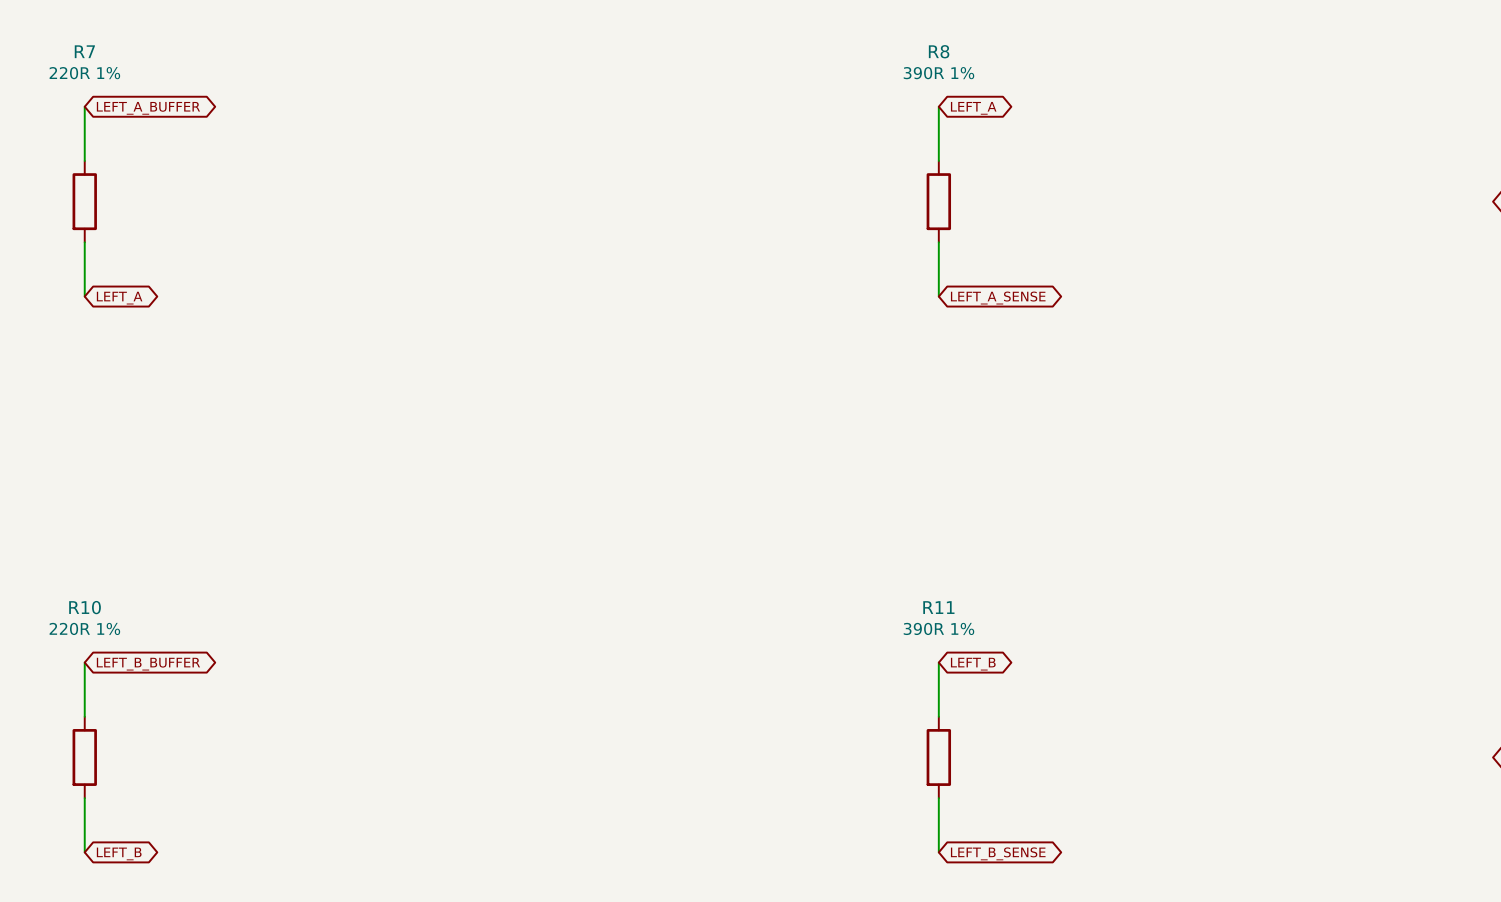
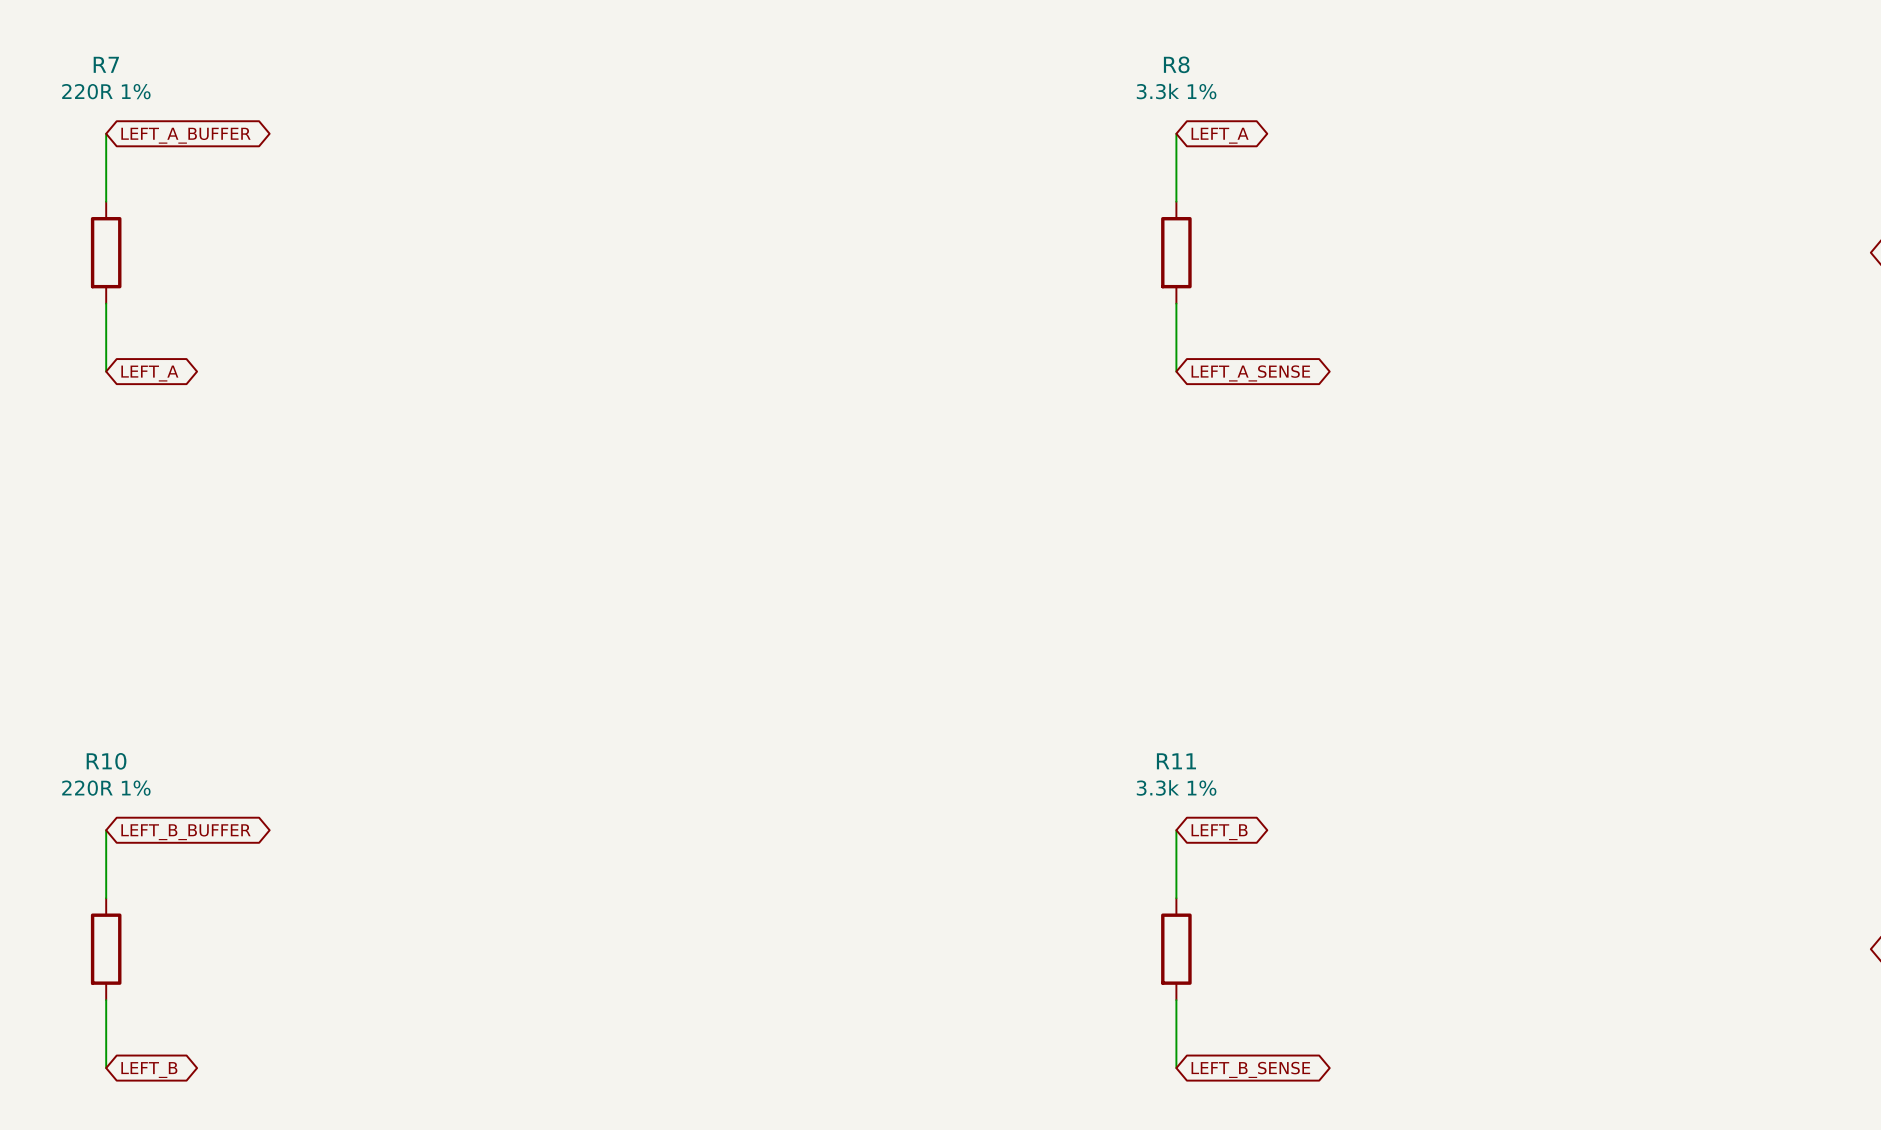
R8 value: 390R 1% (939, 73) -> 3.3k 1% (1176, 91)
R11 value: 390R 1% (939, 628) -> 3.3k 1% (1176, 787)

